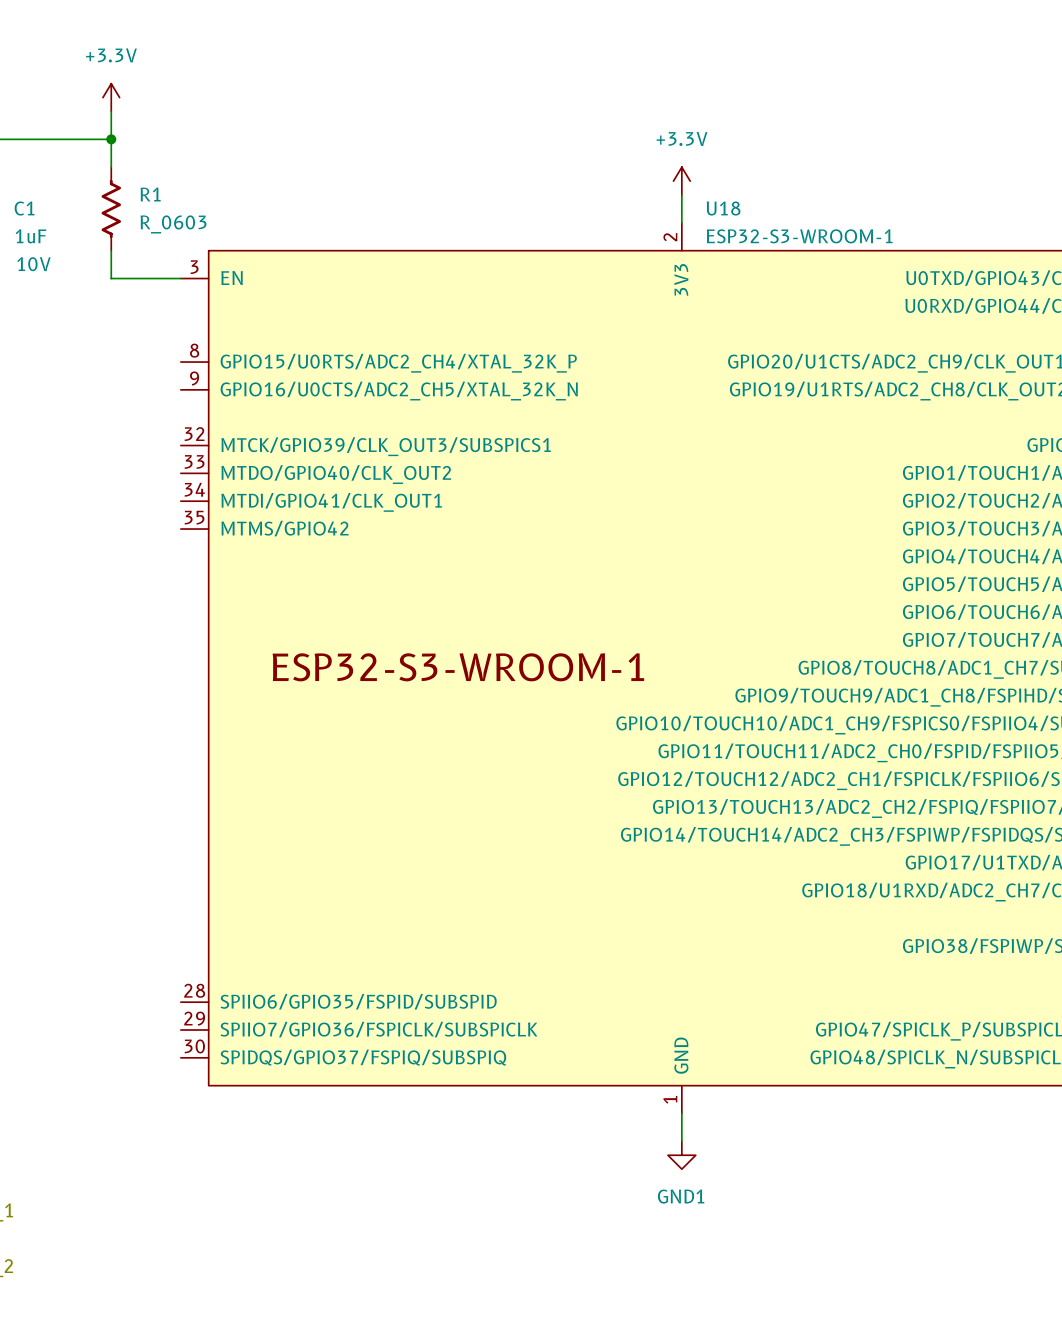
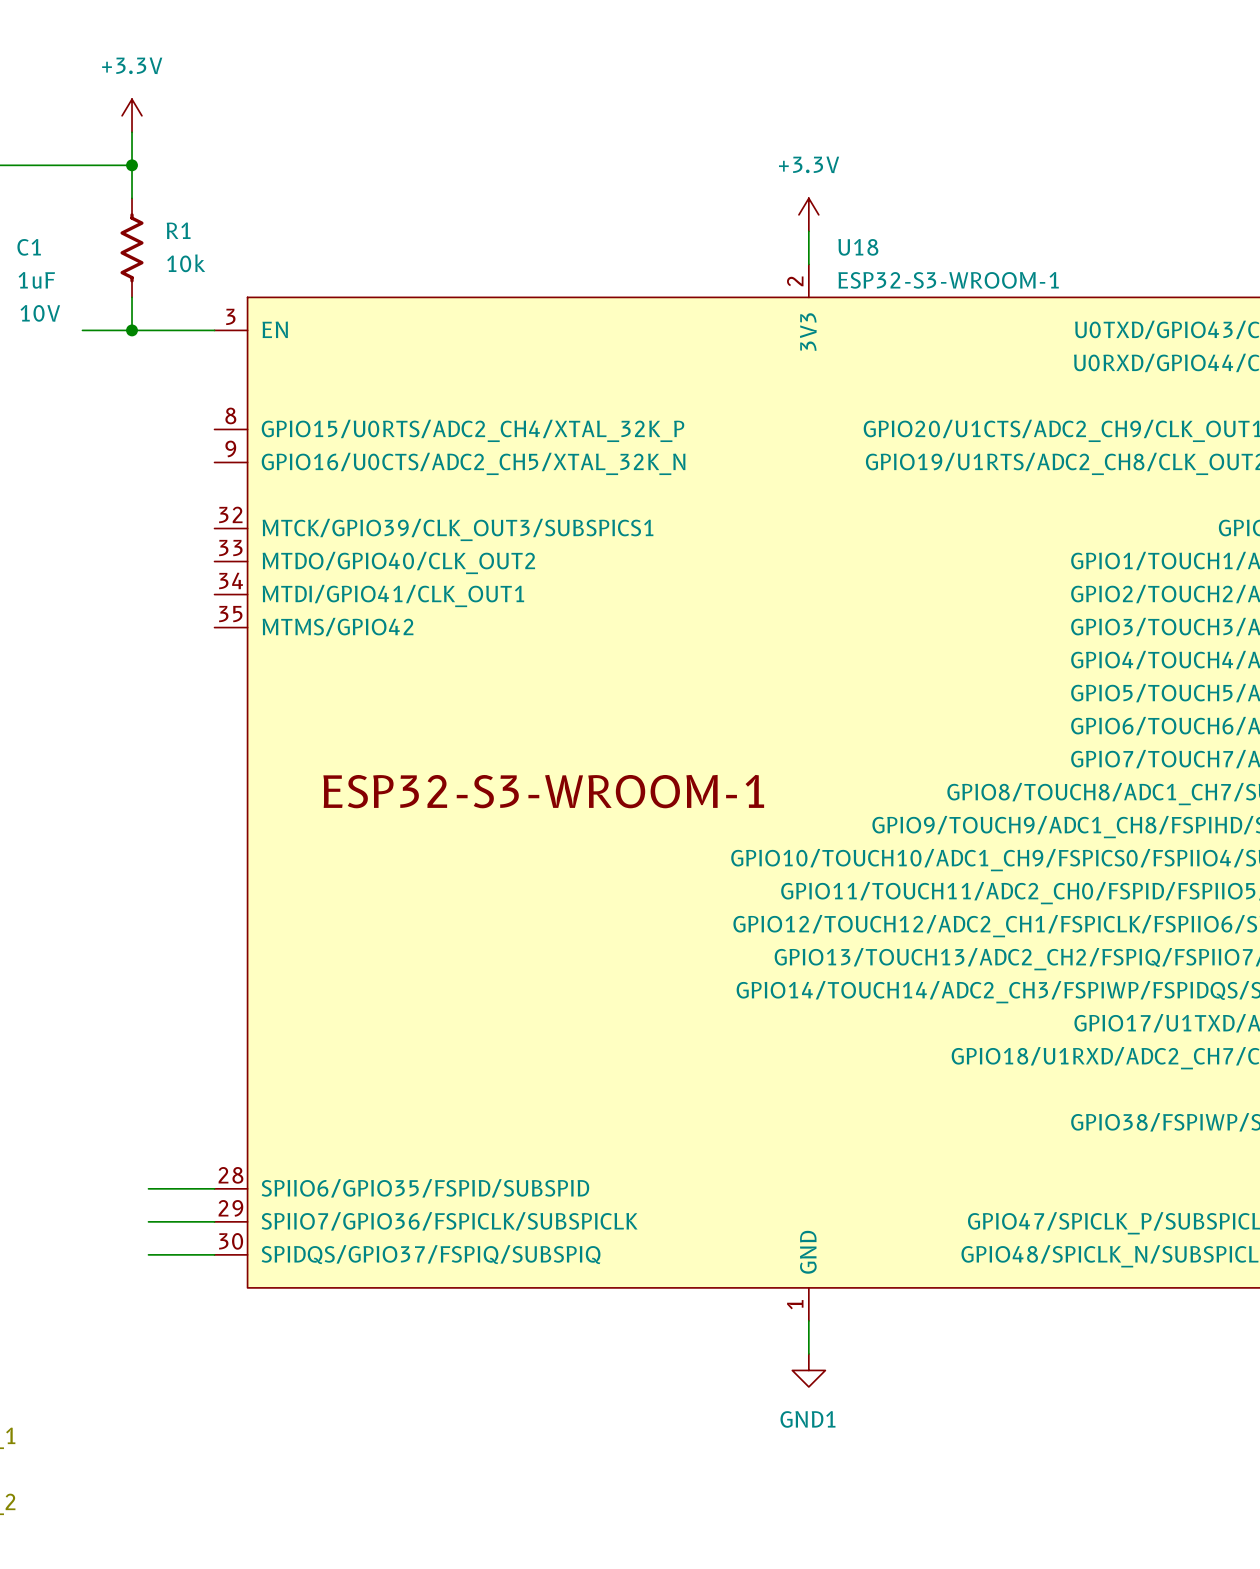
R1 value: R_0603 (173, 224) -> 10k (186, 263)
wire: none -> (82, 330) (132, 330)
junction: none -> (132, 330)
wire: none -> (148, 1188) (214, 1188)
wire: none -> (148, 1221) (214, 1221)
wire: none -> (148, 1254) (214, 1254)

